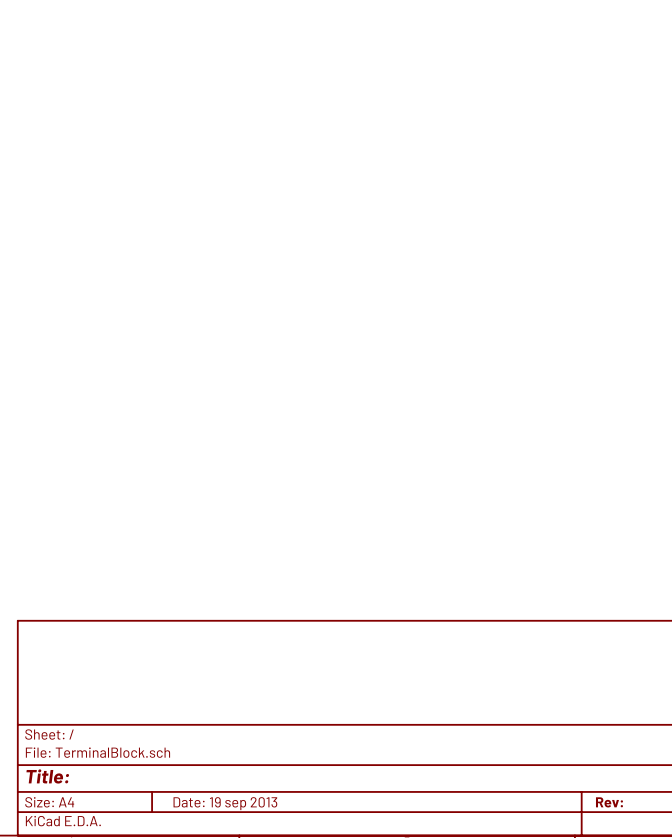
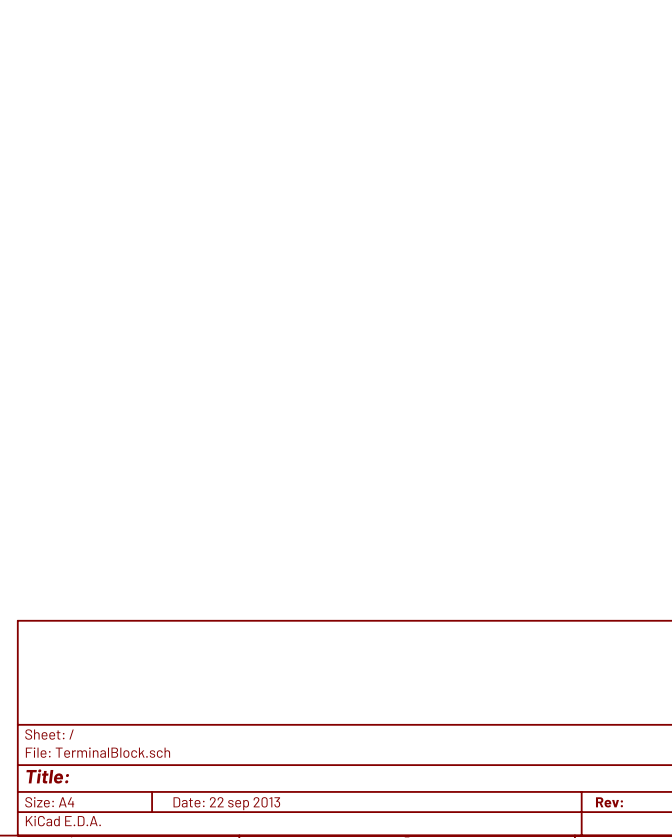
title block: Date: 19 sep 2013 (225, 803) -> Date: 22 sep 2013 (226, 803)

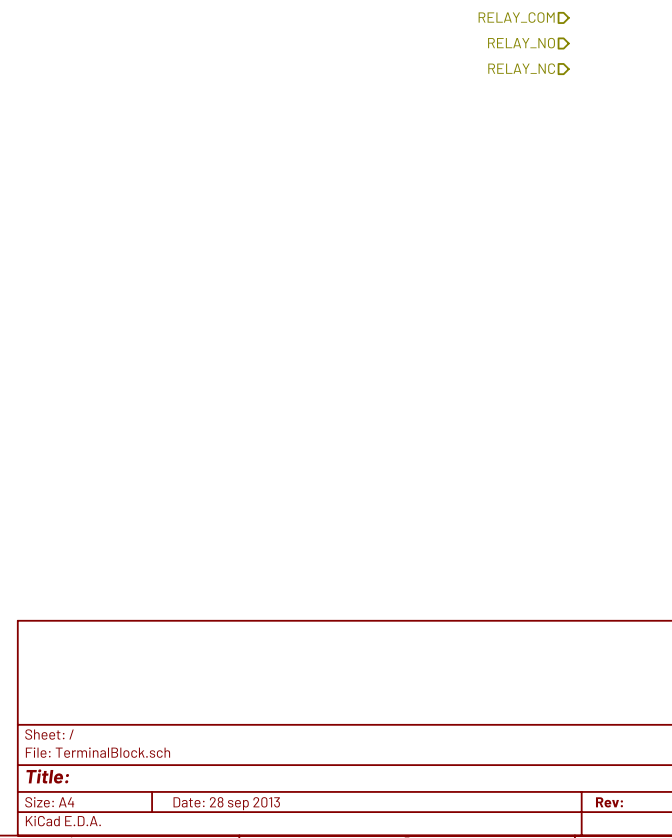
hierarchical label: none -> RELAY_COM (516, 17)
hierarchical label: none -> RELAY_NO (521, 43)
hierarchical label: none -> RELAY_NC (521, 68)
title block: Date: 22 sep 2013 (226, 803) -> Date: 28 sep 2013 (226, 803)

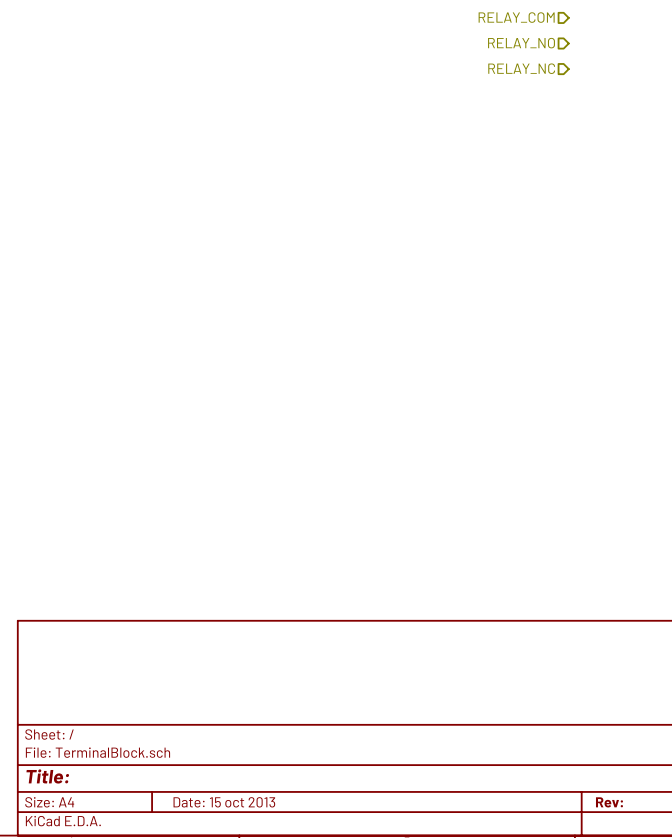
title block: Date: 28 sep 2013 (226, 803) -> Date: 15 oct 2013 (224, 802)

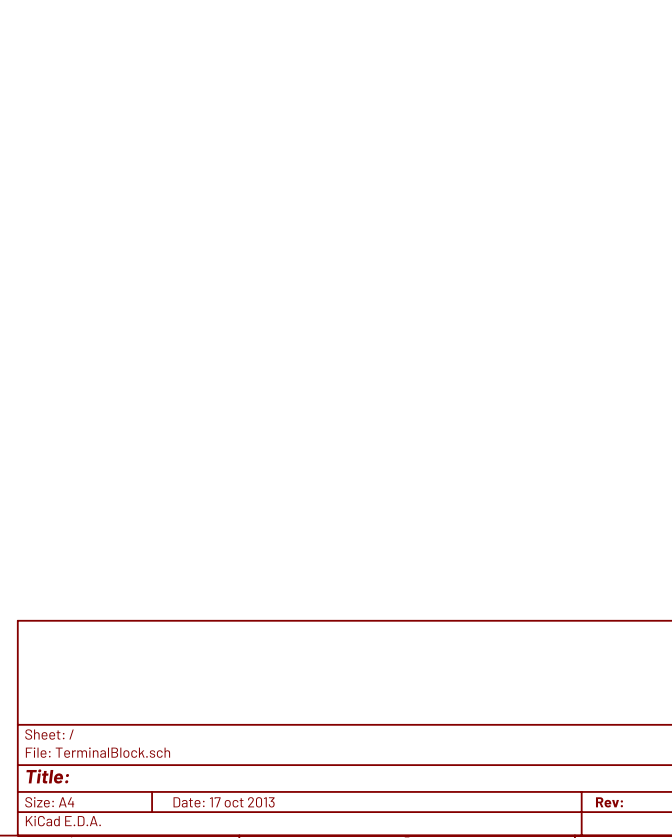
hierarchical label: RELAY_COM (516, 17) -> none
hierarchical label: RELAY_NO (521, 43) -> none
hierarchical label: RELAY_NC (521, 68) -> none
title block: Date: 15 oct 2013 (224, 802) -> Date: 17 oct 2013 (224, 802)

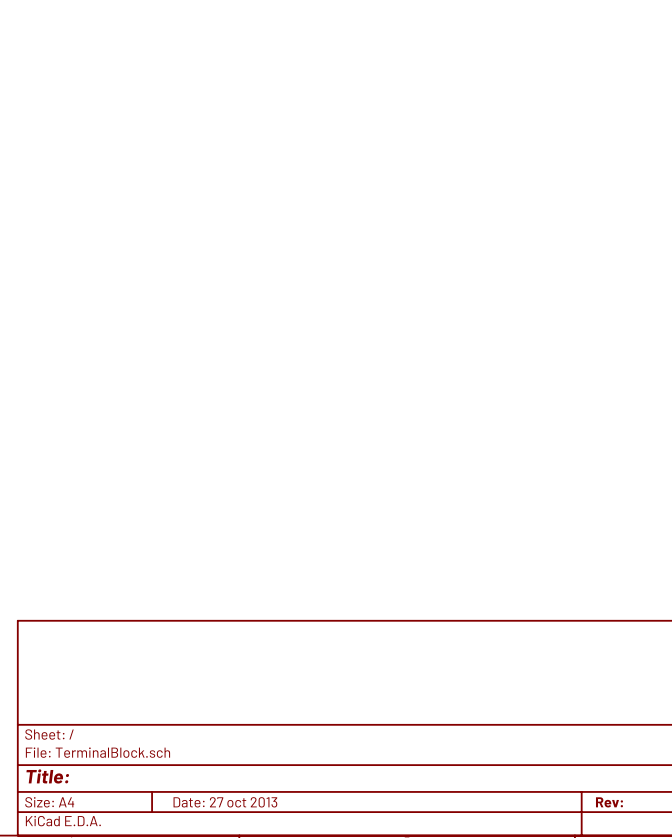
title block: Date: 17 oct 2013 (224, 802) -> Date: 27 oct 2013 (225, 802)

